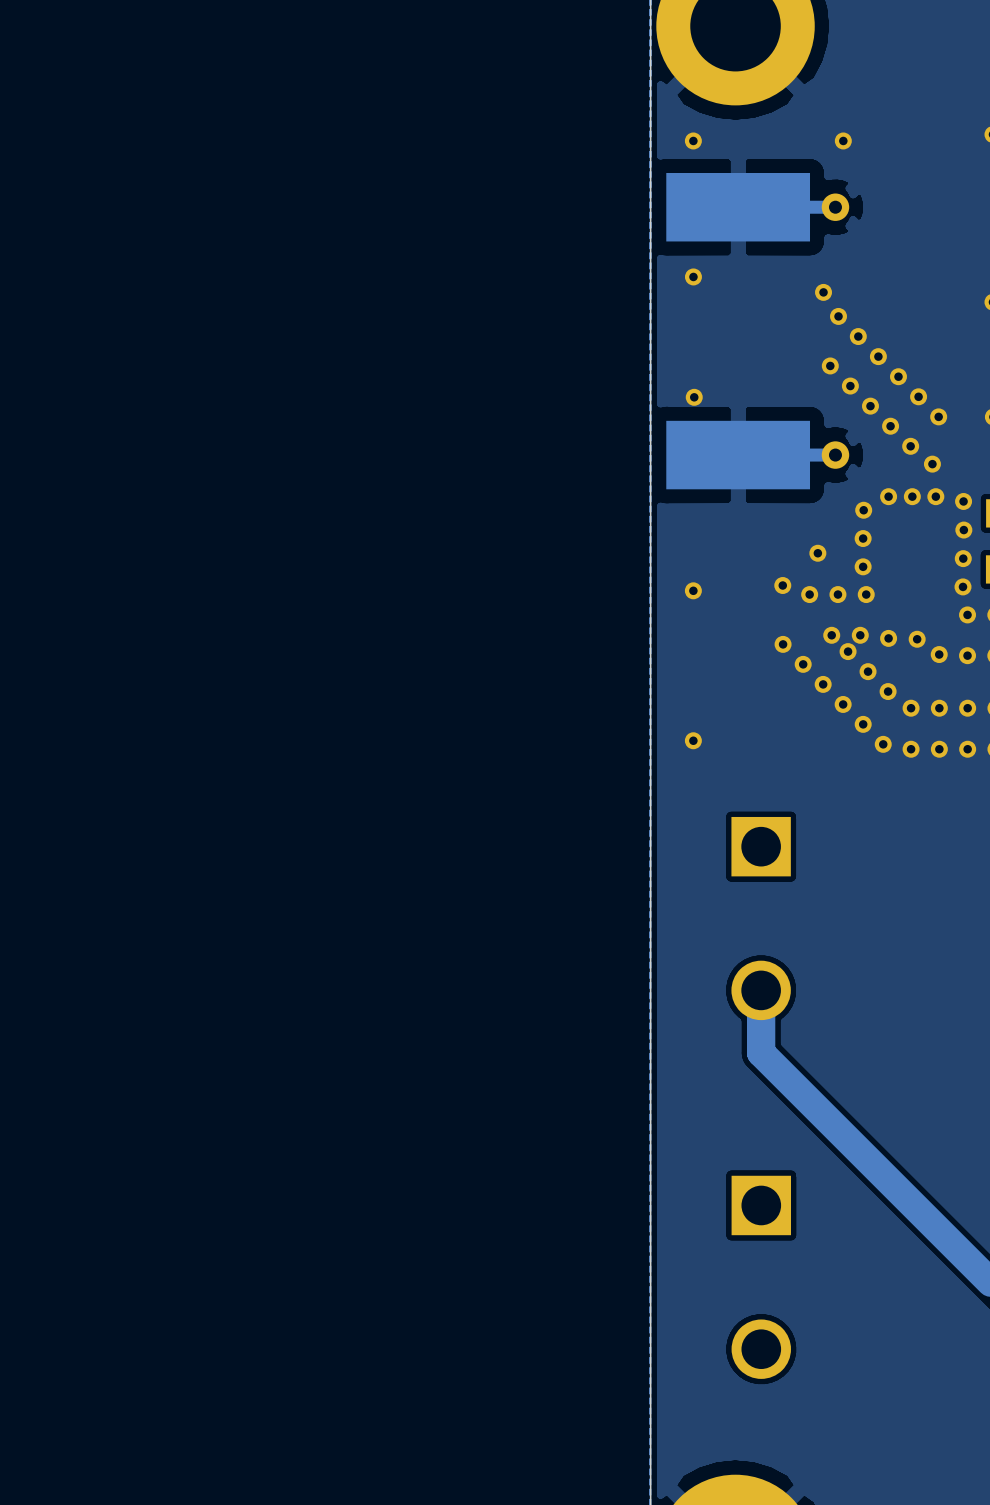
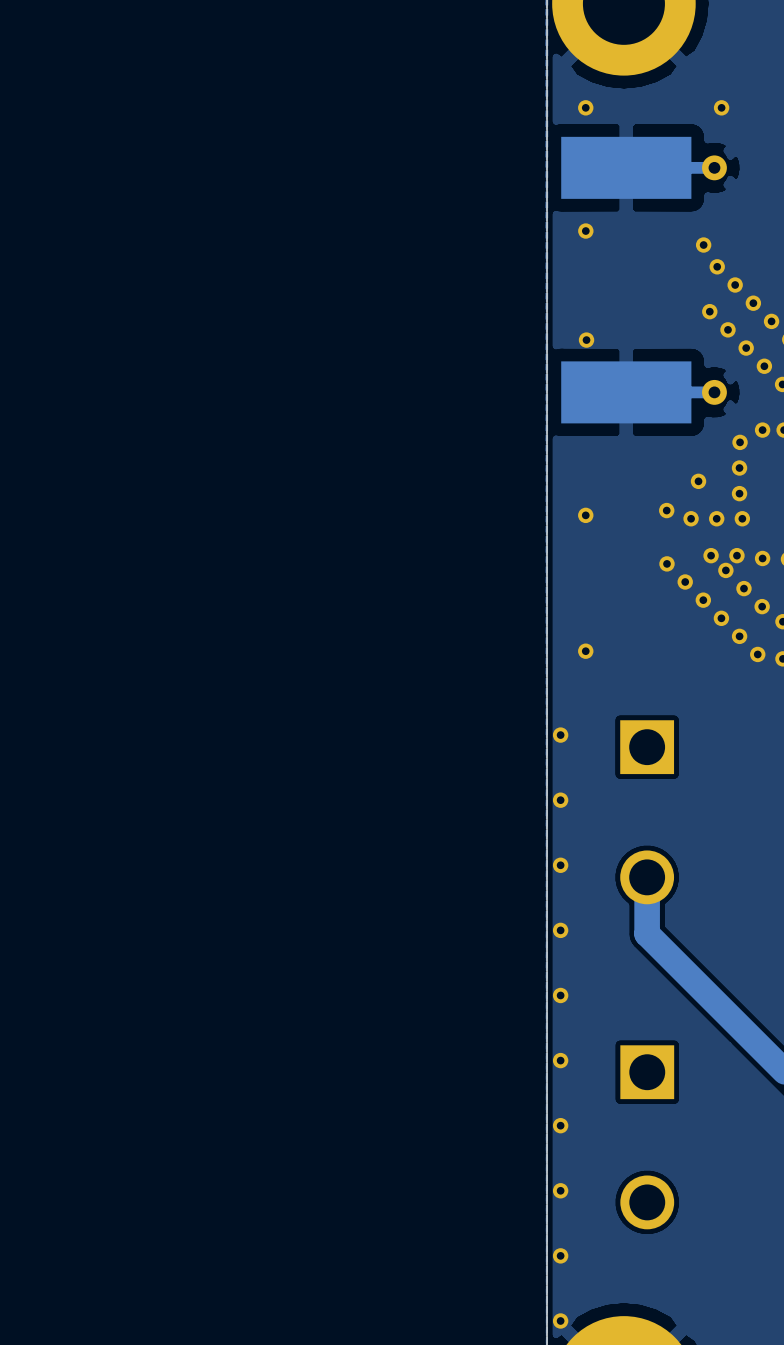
part: none -> (560, 735)
part: none -> (560, 800)
part: none -> (560, 865)
part: none -> (560, 930)
part: none -> (560, 995)
part: none -> (560, 1060)
part: none -> (560, 1125)
part: none -> (560, 1190)
part: none -> (560, 1255)
part: none -> (560, 1320)

